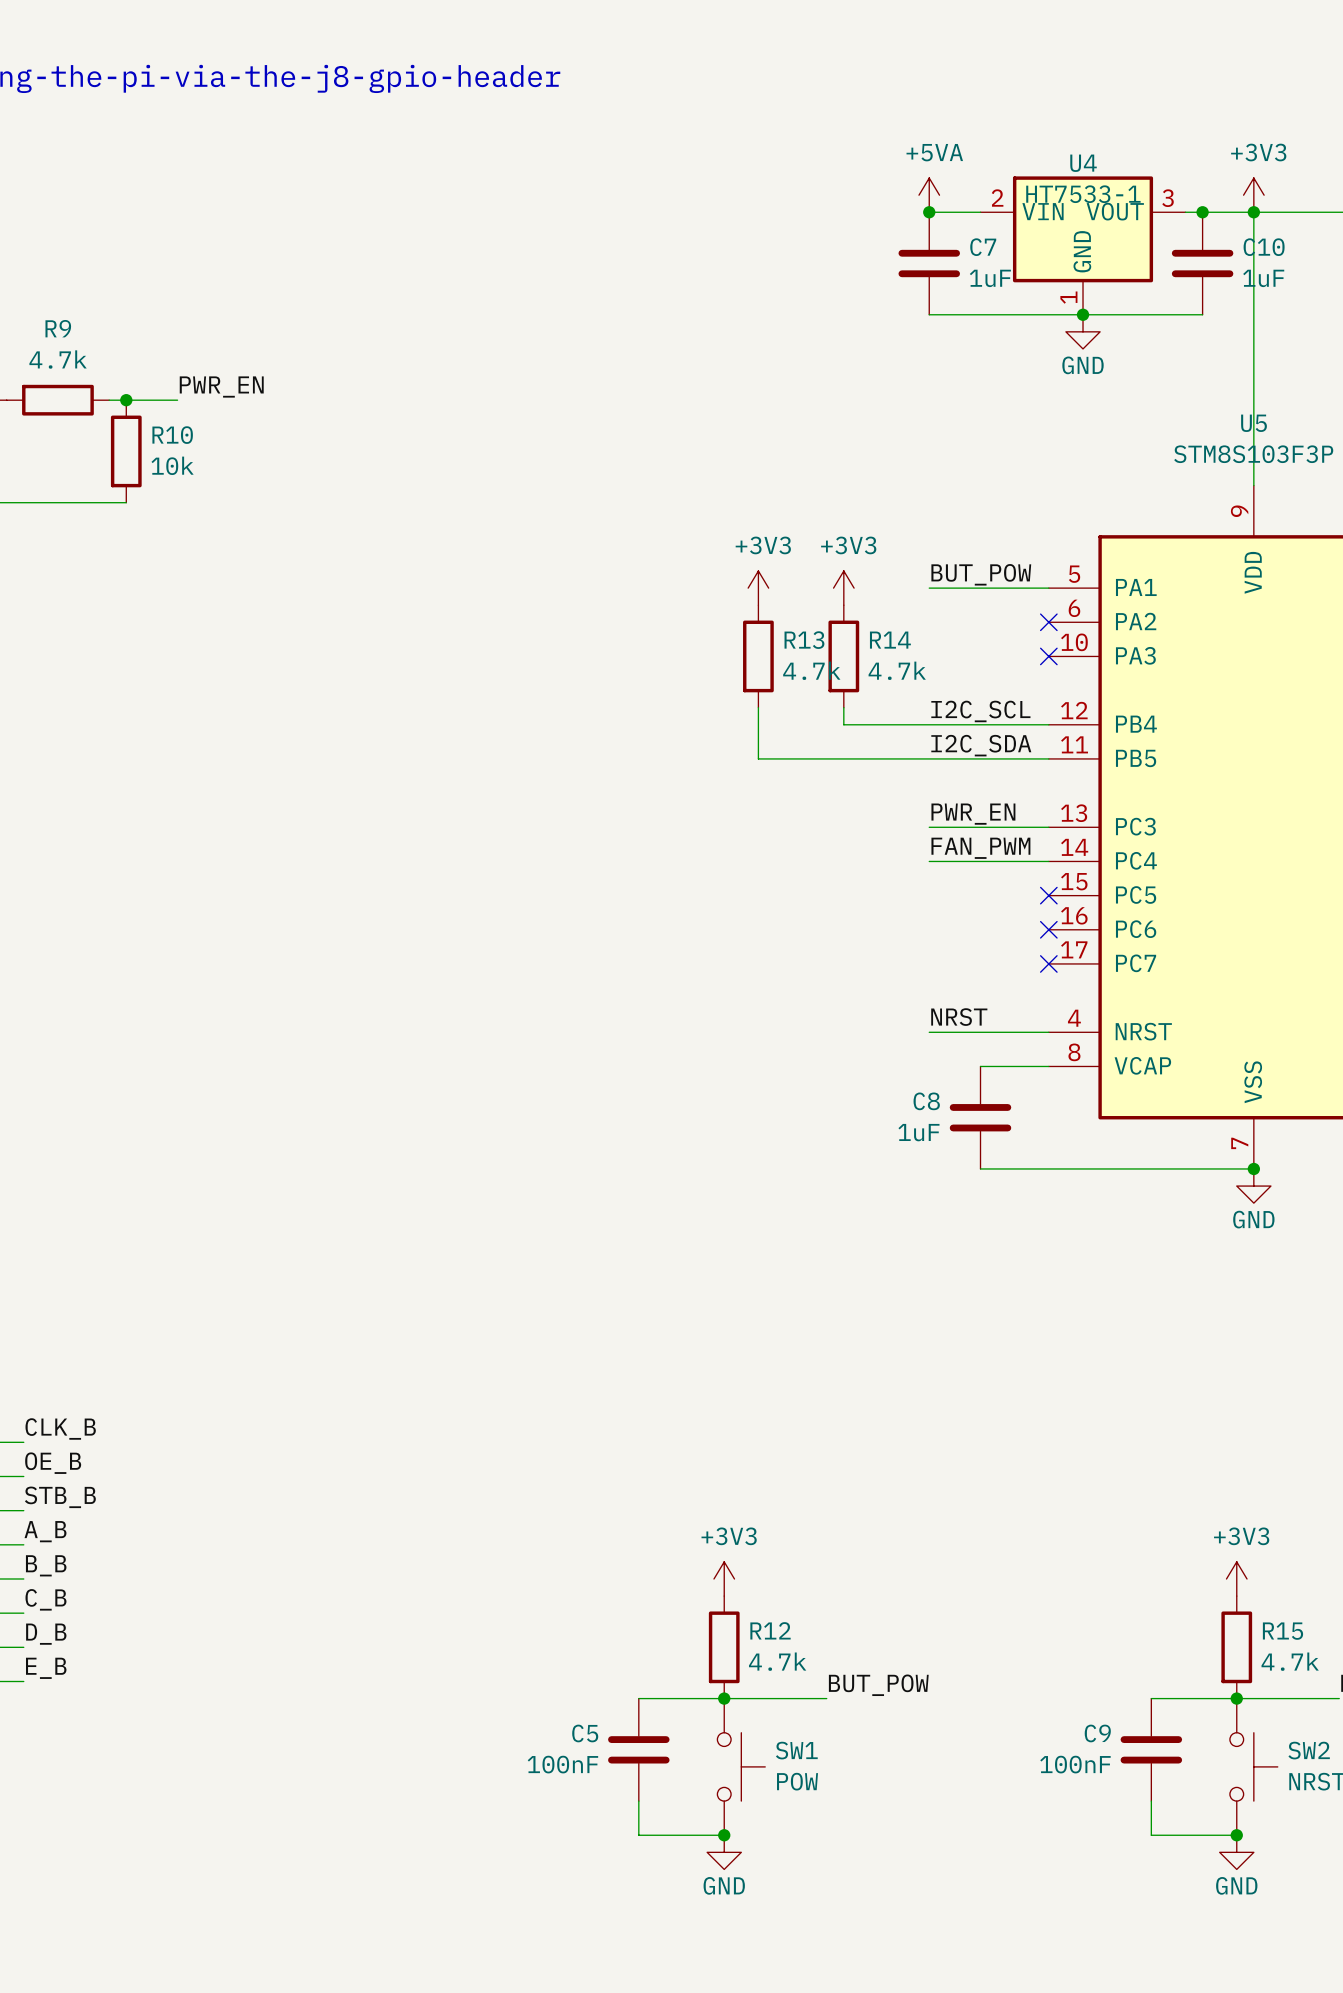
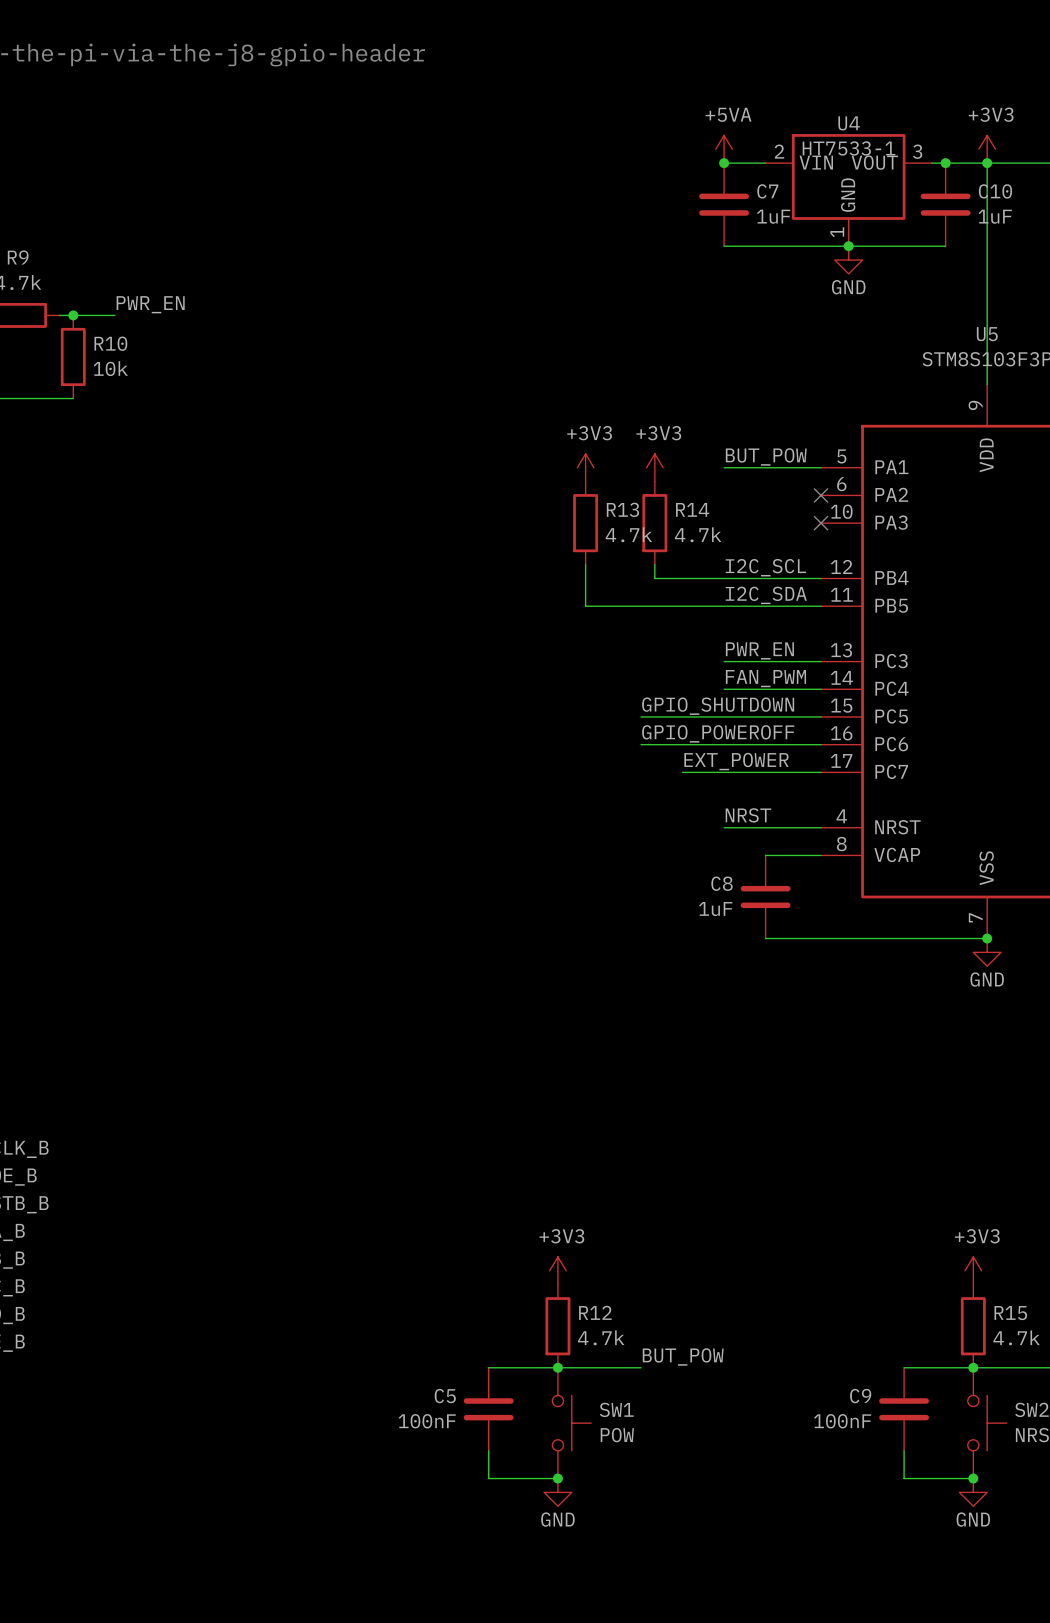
label: none -> GPIO_SHUTDOWN (718, 706)
wire: none -> (641, 716) (821, 716)
no-connect mark: (1048, 895) -> none
label: none -> GPIO_POWEROFF (718, 733)
wire: none -> (641, 744) (821, 744)
no-connect mark: (1048, 929) -> none
label: none -> EXT_POWER (736, 761)
wire: none -> (682, 772) (821, 772)
no-connect mark: (1048, 963) -> none

